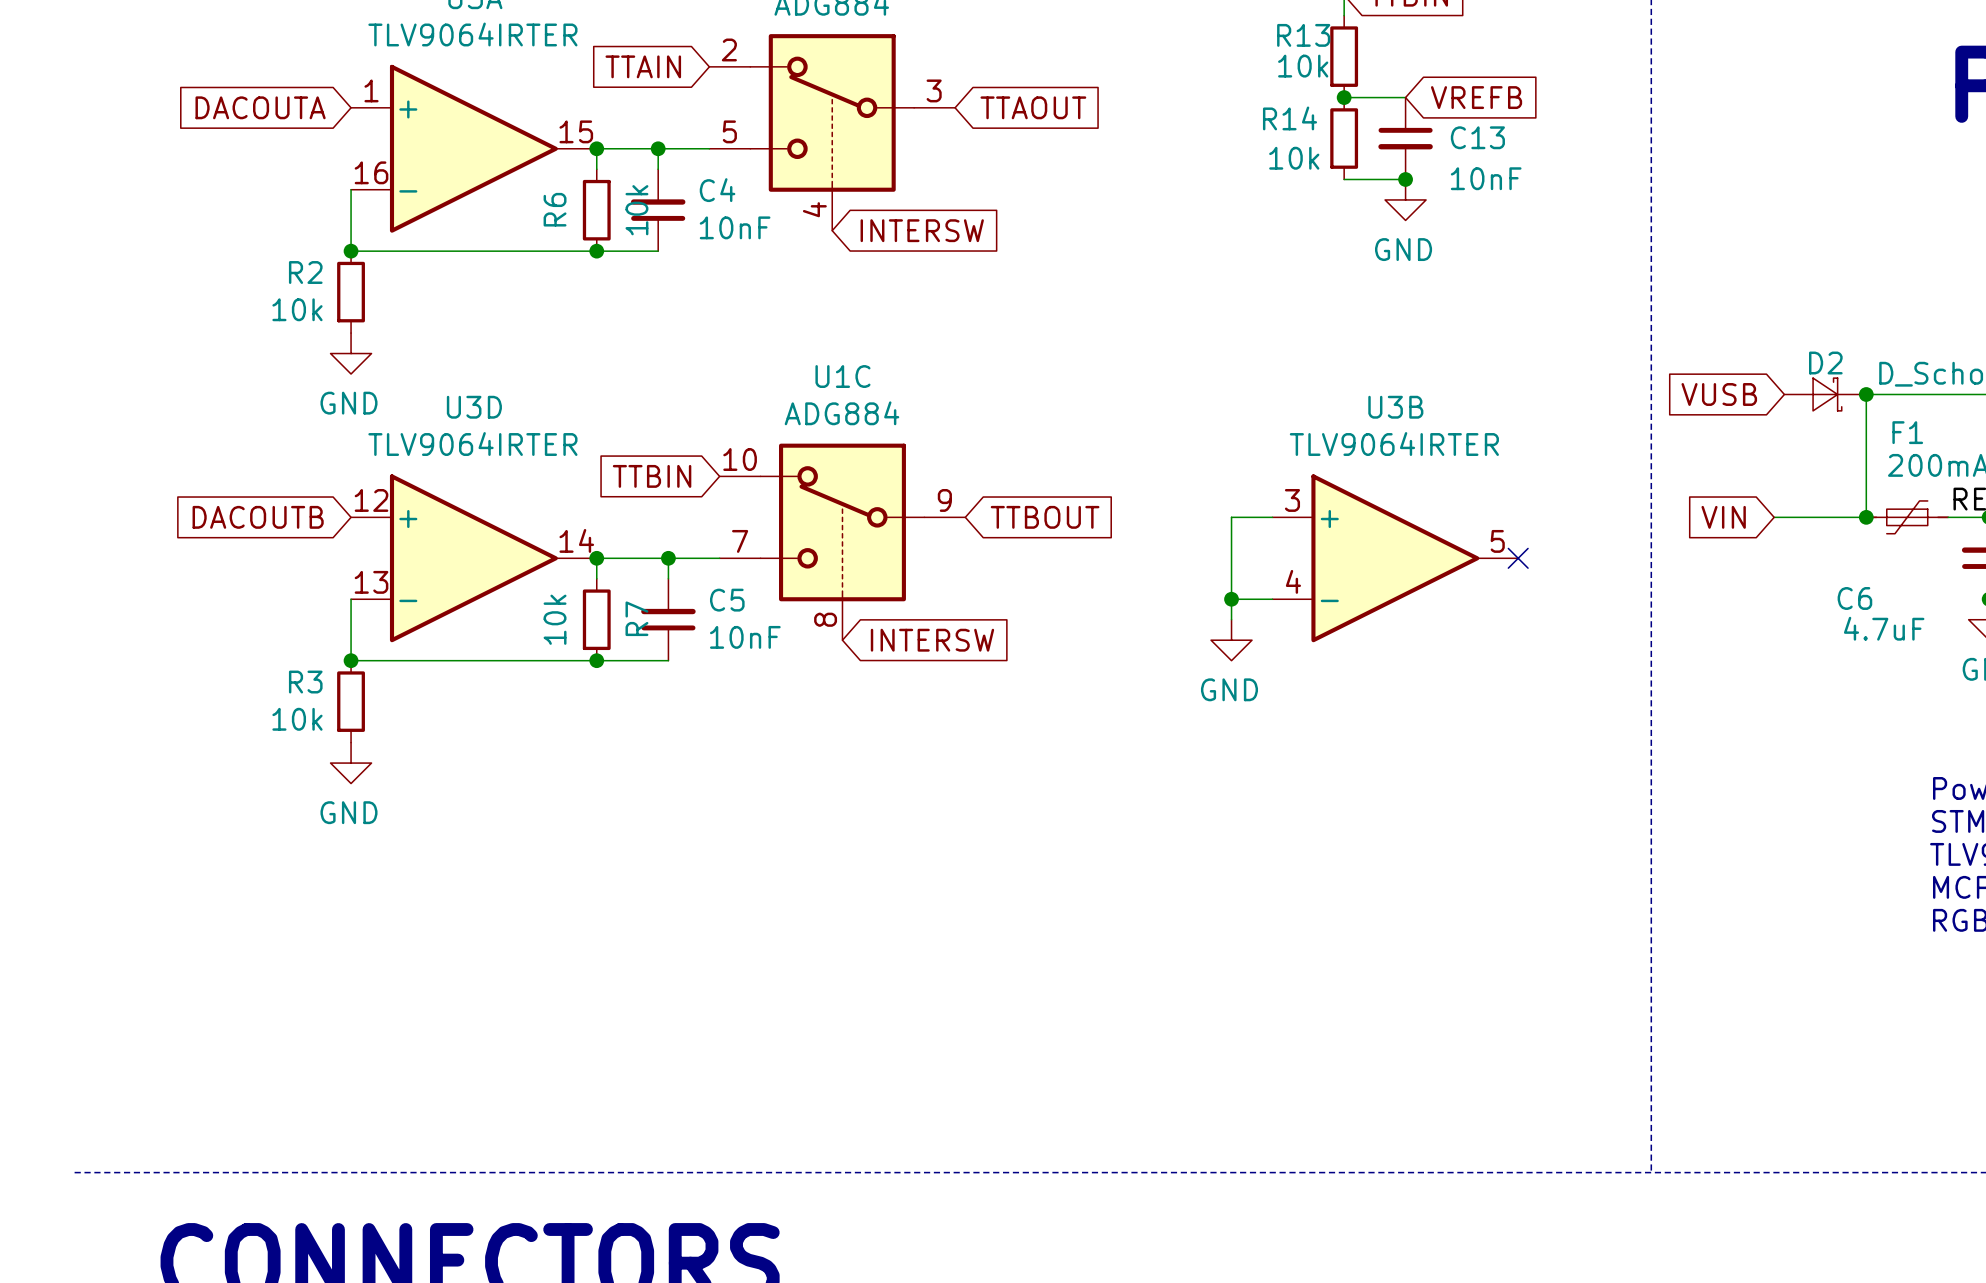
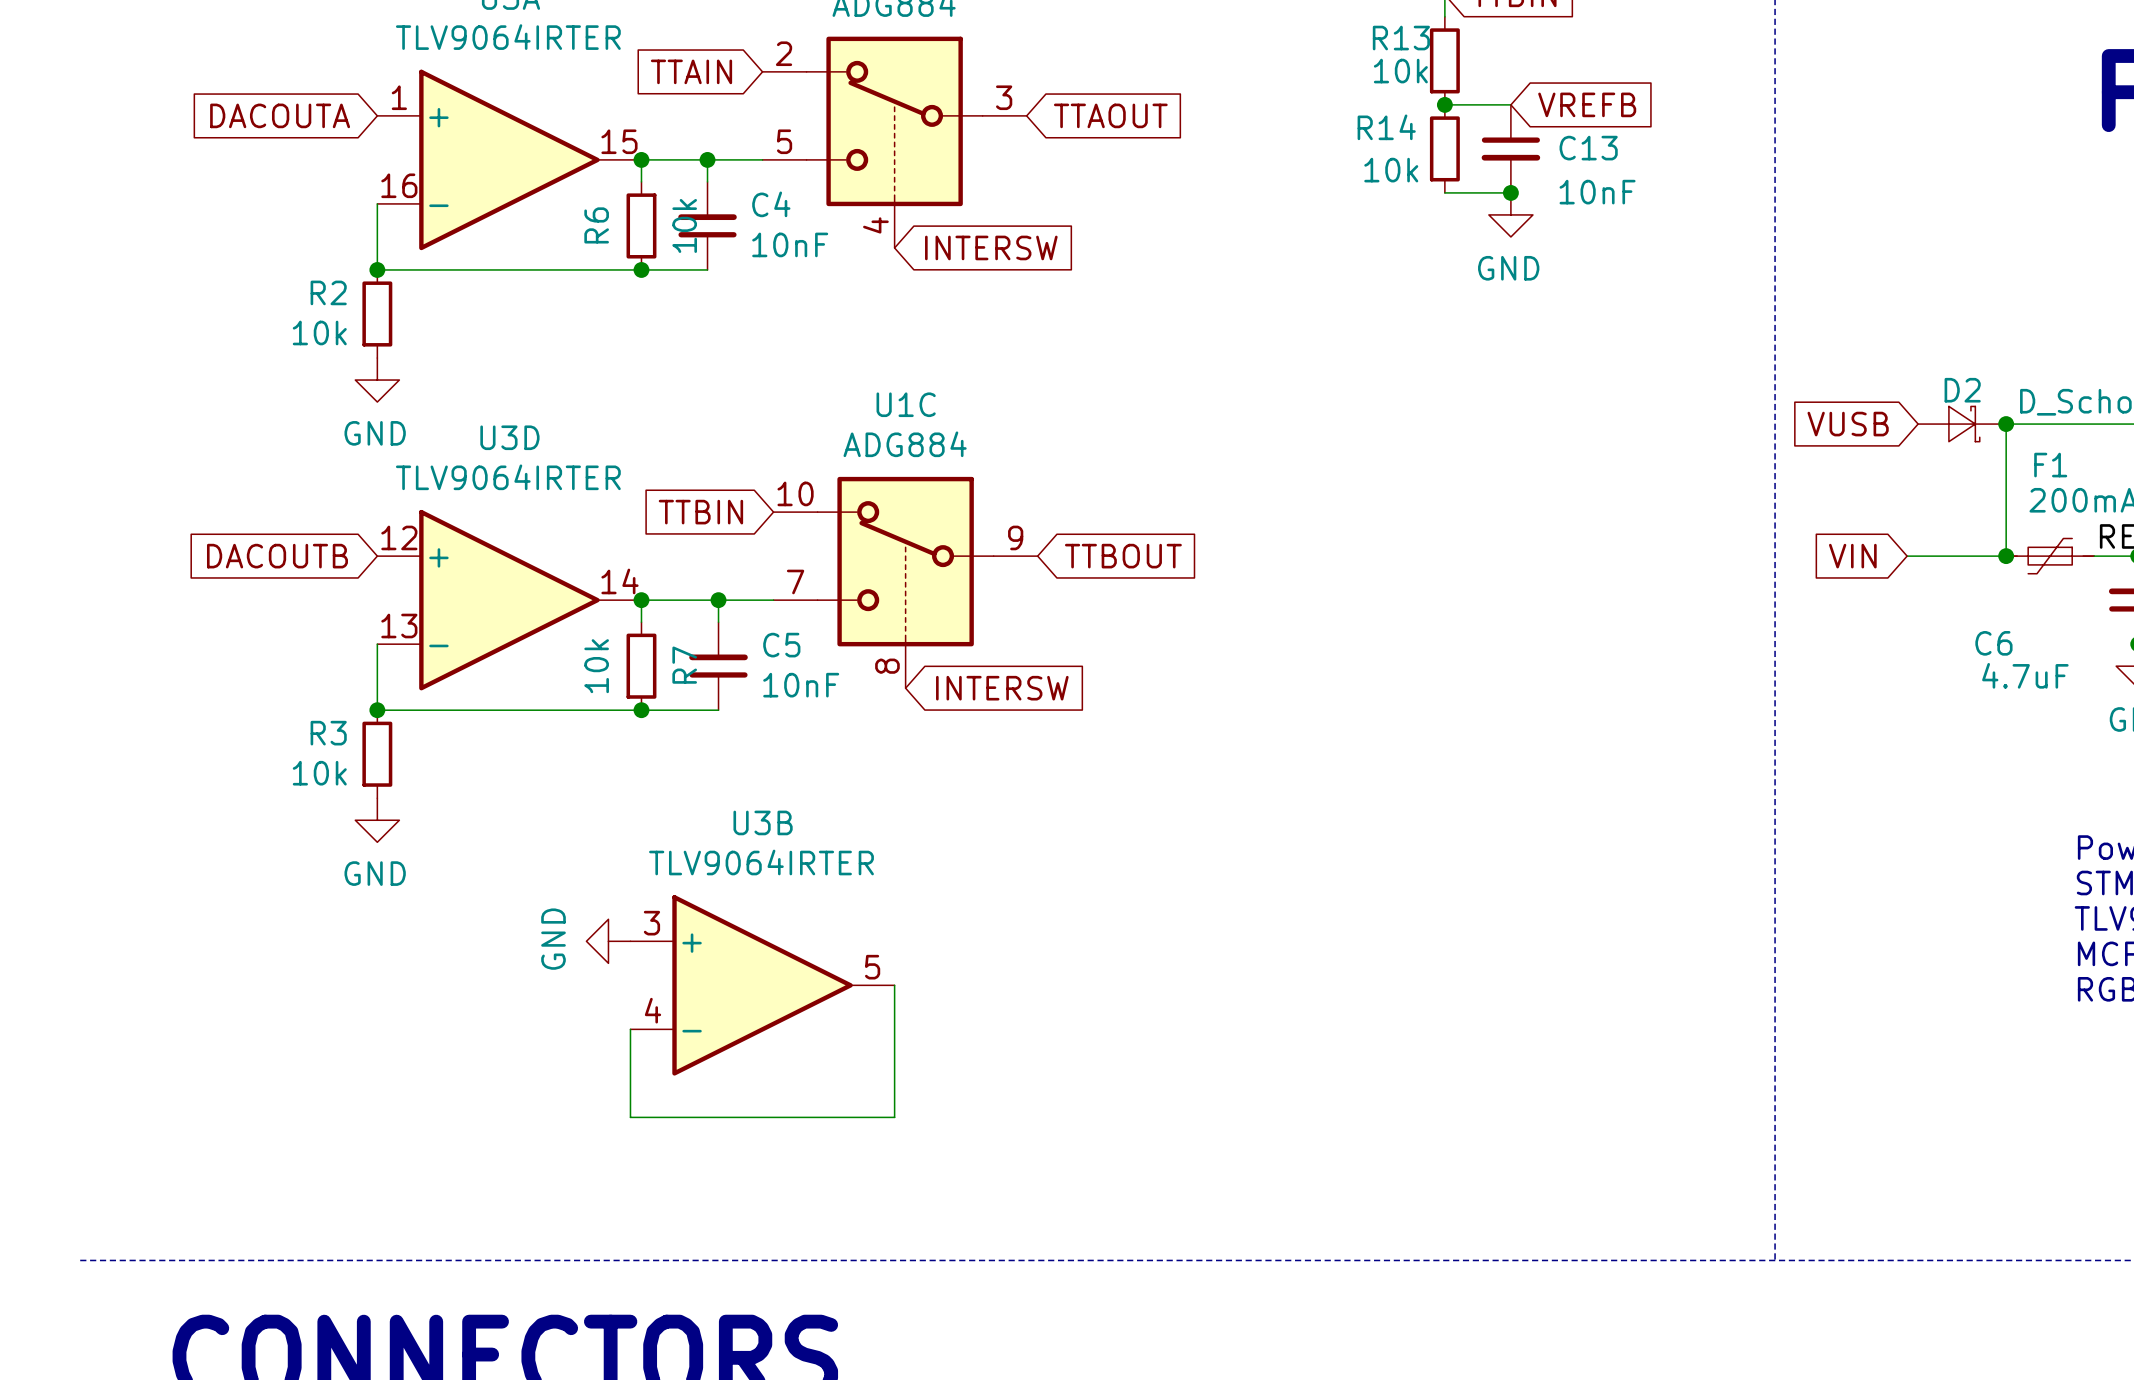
wire: (1272, 517) (1231, 517) (1231, 619) -> none
U3B position: (1395, 558) -> (762, 985)
no-connect mark: (1518, 558) -> none
wire: (1231, 599) (1272, 599) -> none
junction: (1231, 599) -> none
power symbol: GND (1231, 640) -> none
power symbol: none -> GND (608, 941)
wire: none -> (894, 985) (894, 1117) (630, 1117) (630, 1029)

